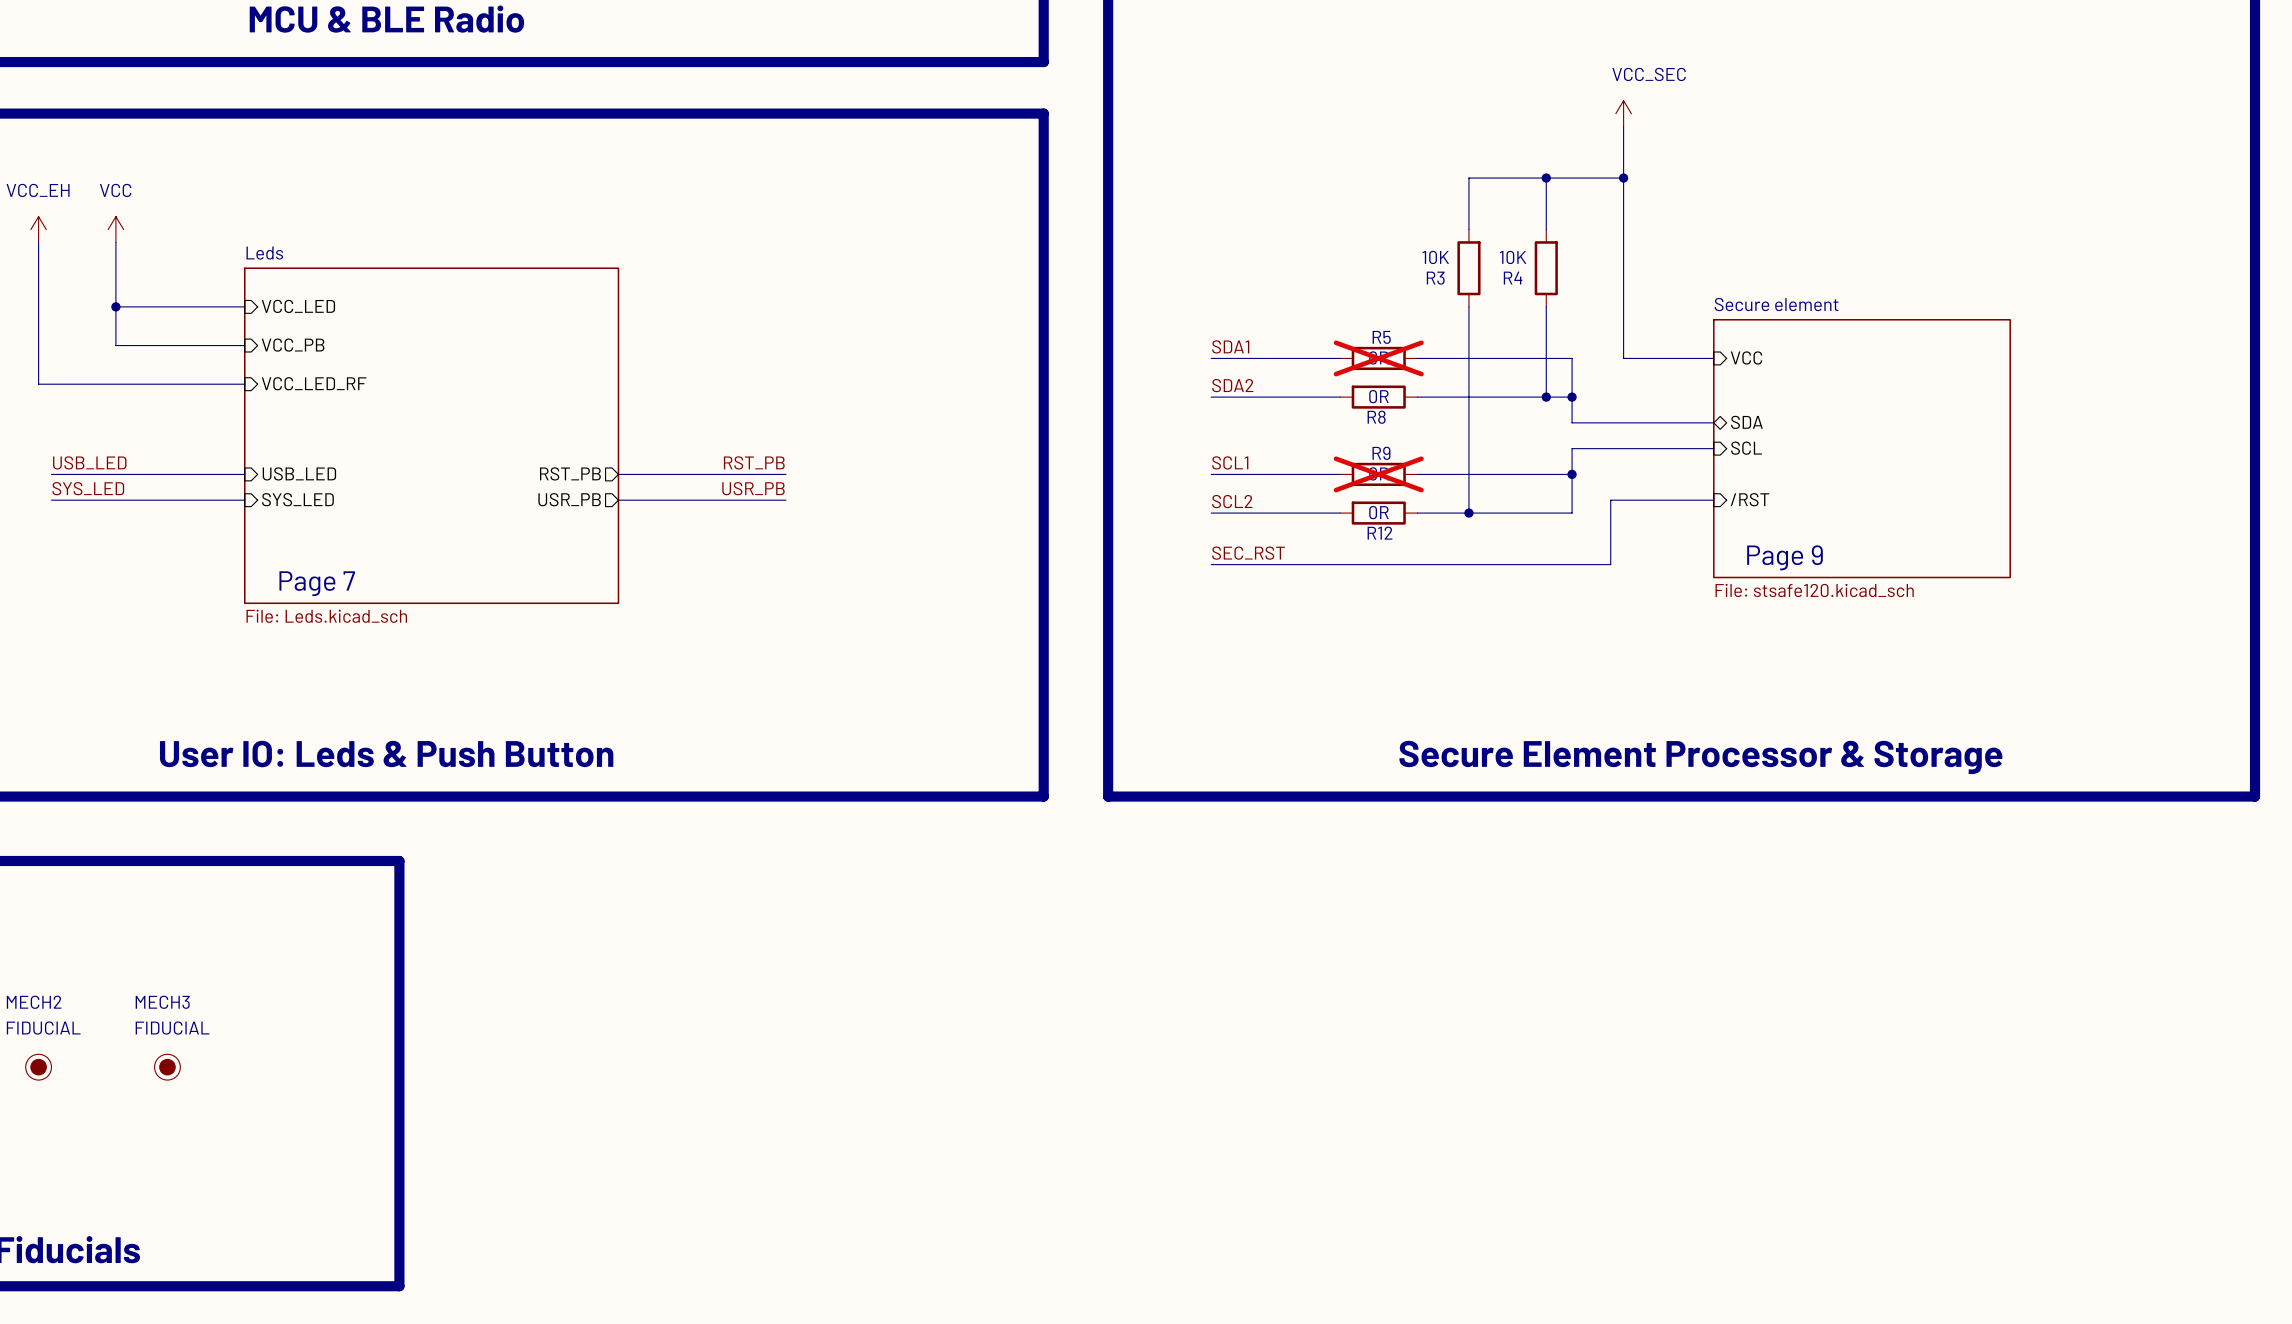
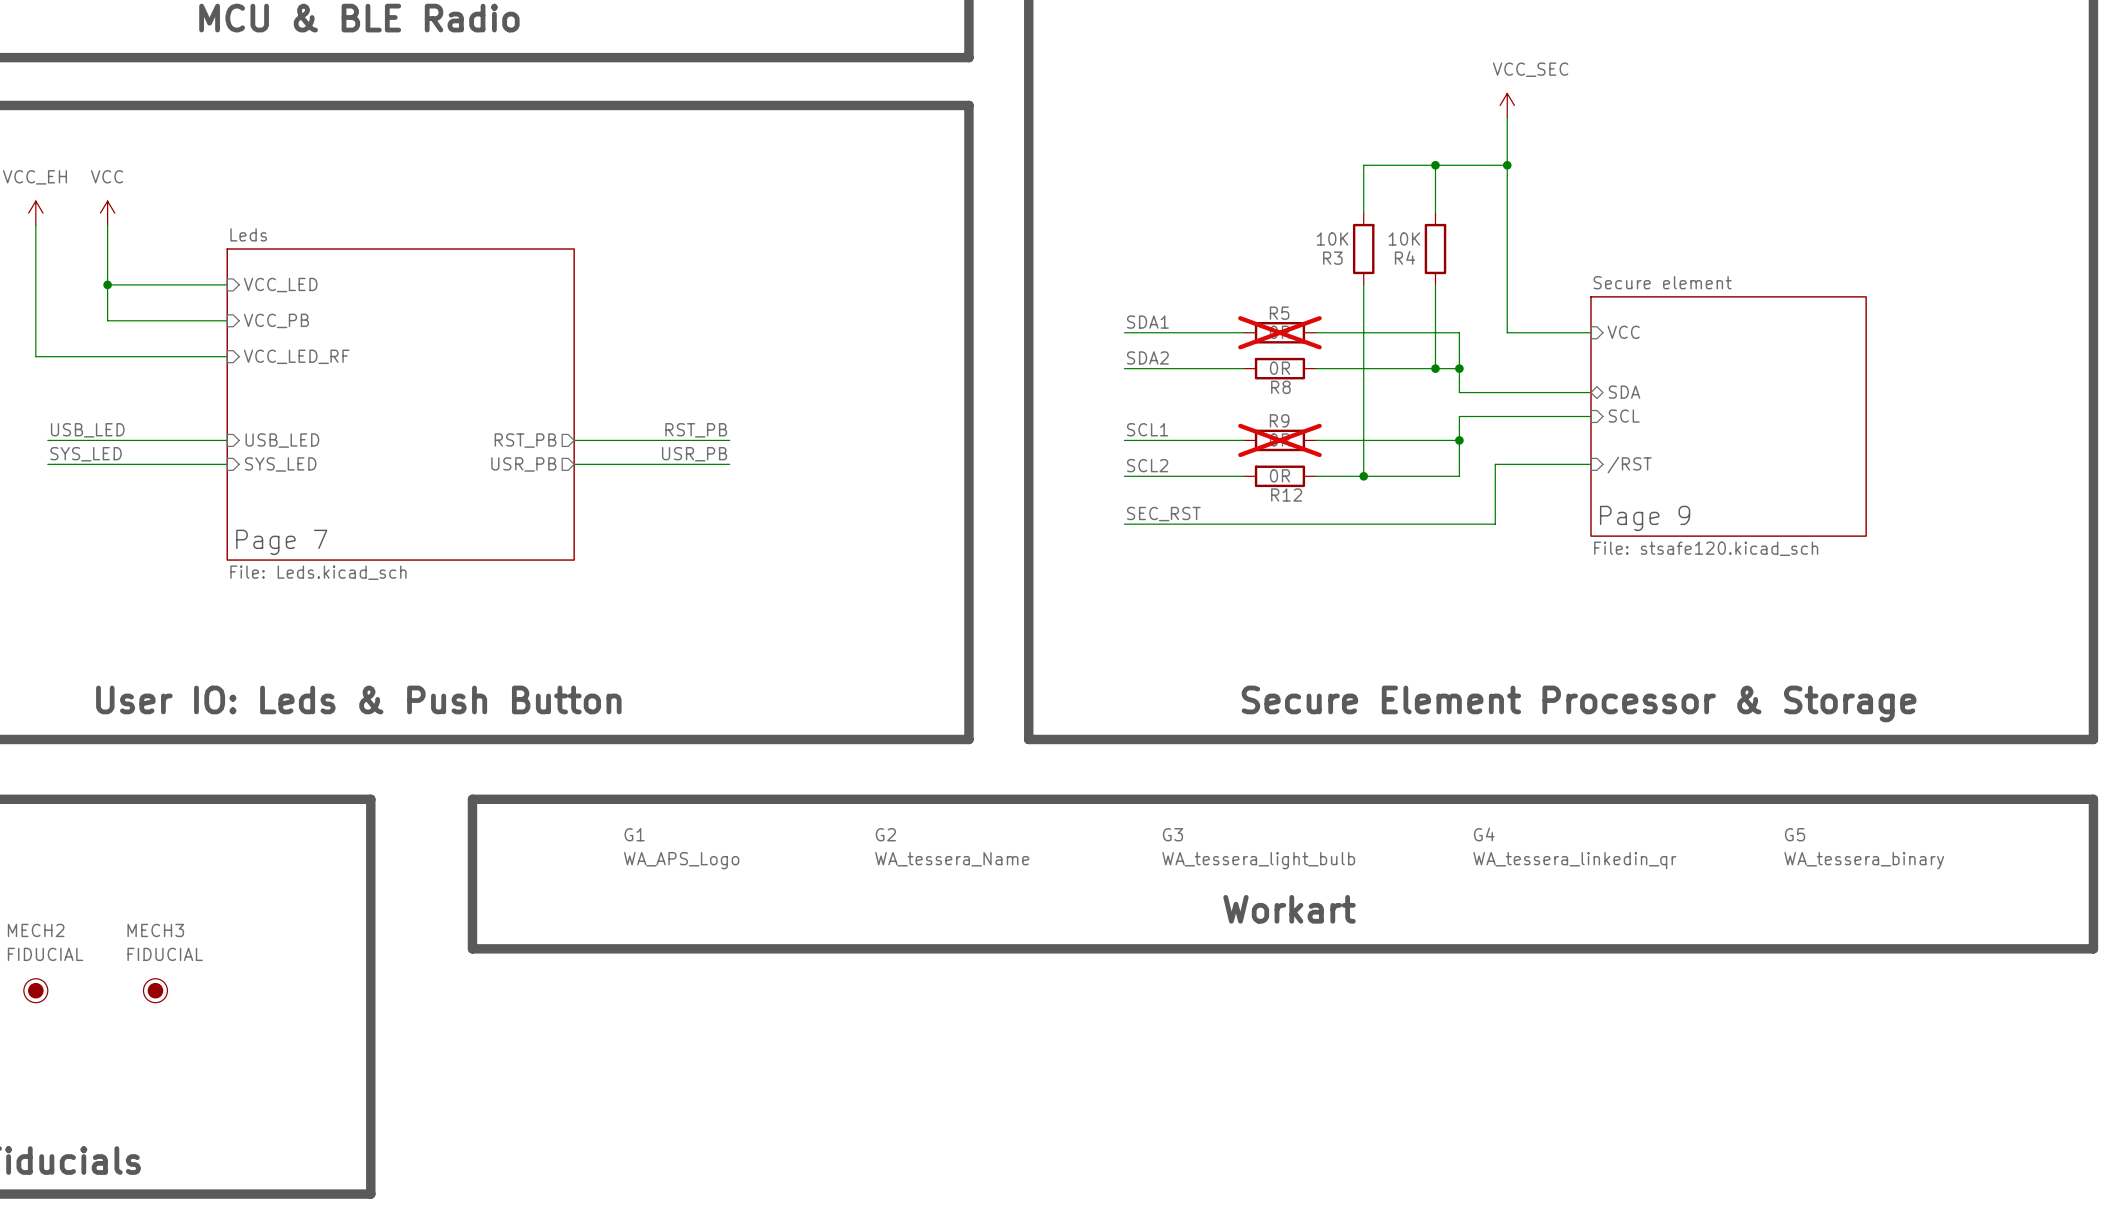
line: none -> (472, 799) (2093, 799) (2093, 948) (472, 948) (472, 799)
G2: none -> WA_tessera_Name (952, 847)
G1: none -> WA_APS_Logo (681, 848)
G3: none -> WA_tessera_light_bulb (1258, 848)
G4: none -> WA_tessera_linkedin_qr (1574, 848)
G5: none -> WA_tessera_binary (1864, 848)
text: none -> Workart (1289, 909)

